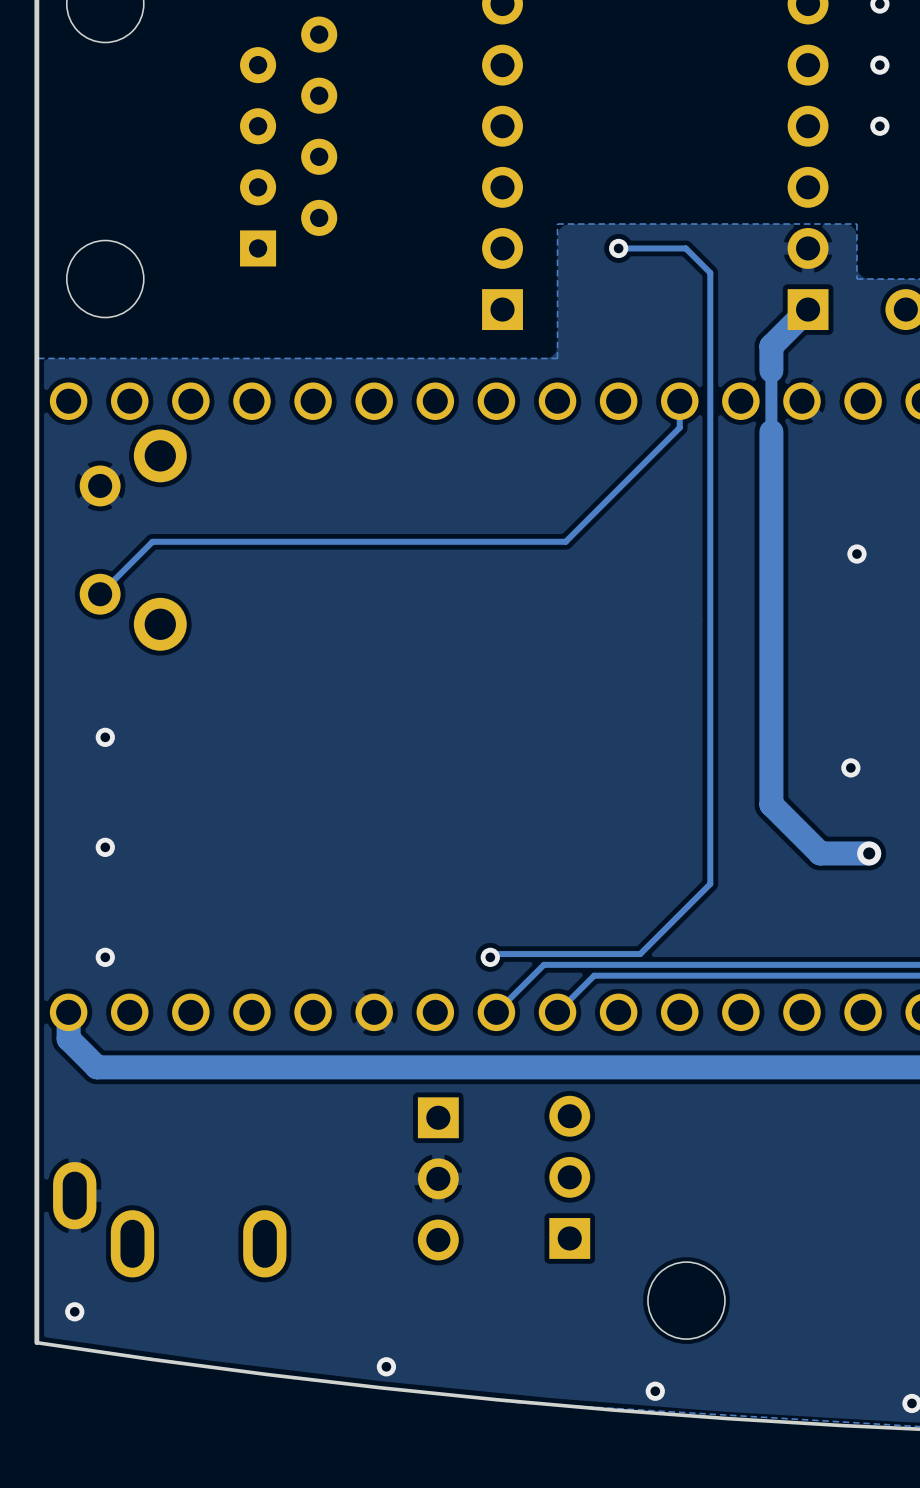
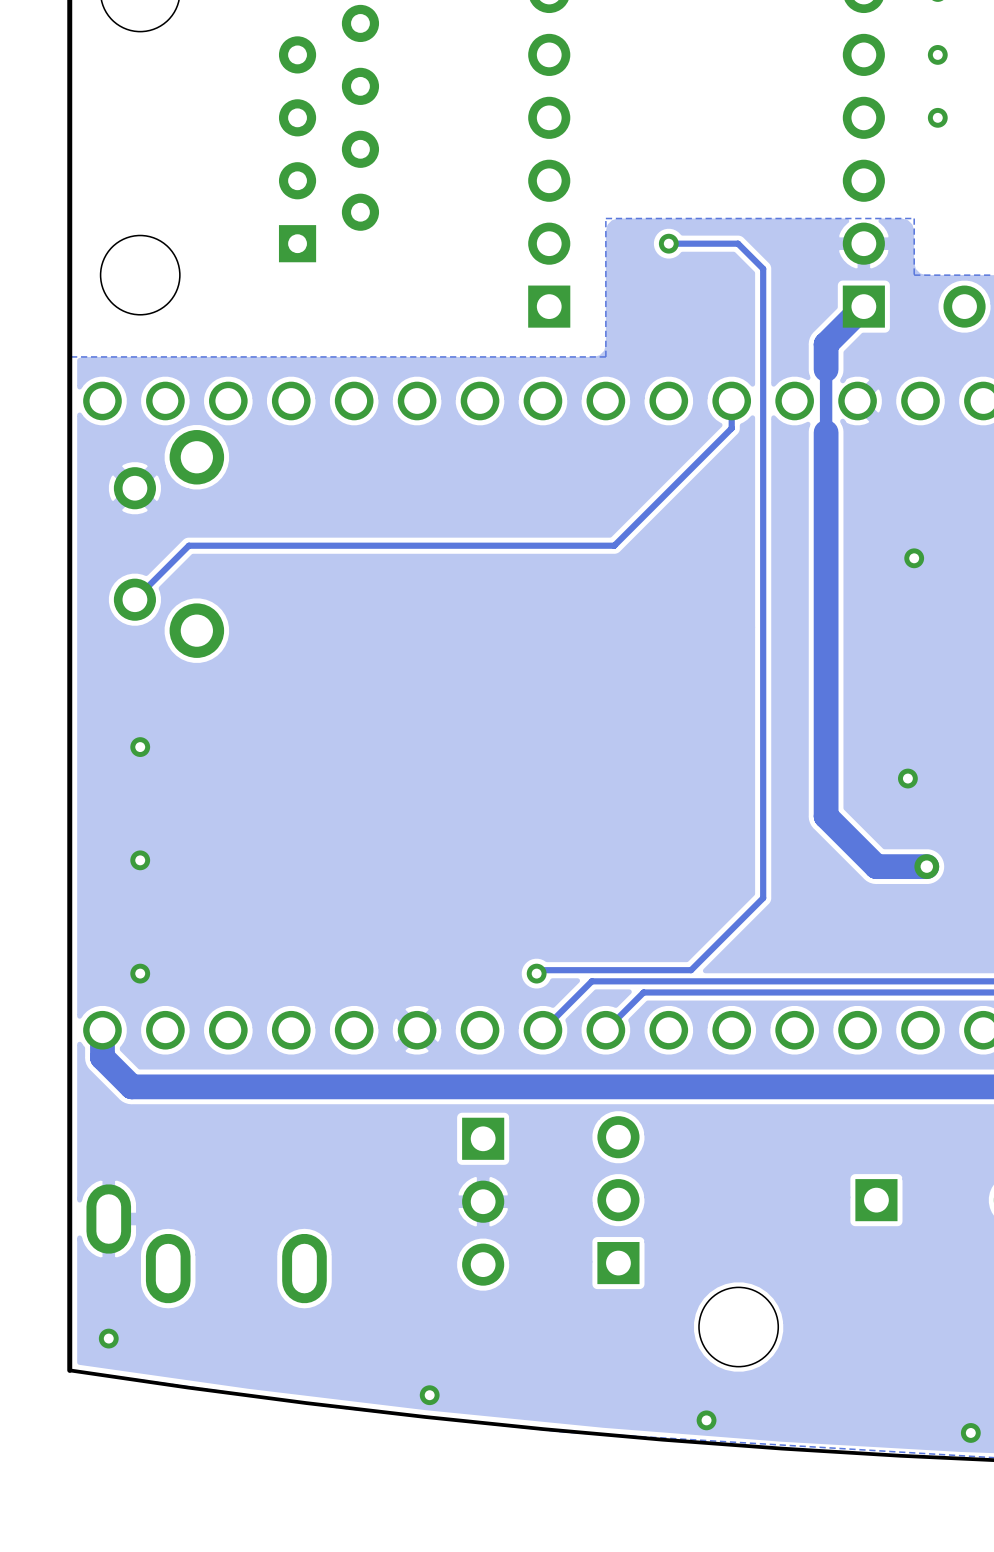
part: none -> (876, 1200)

